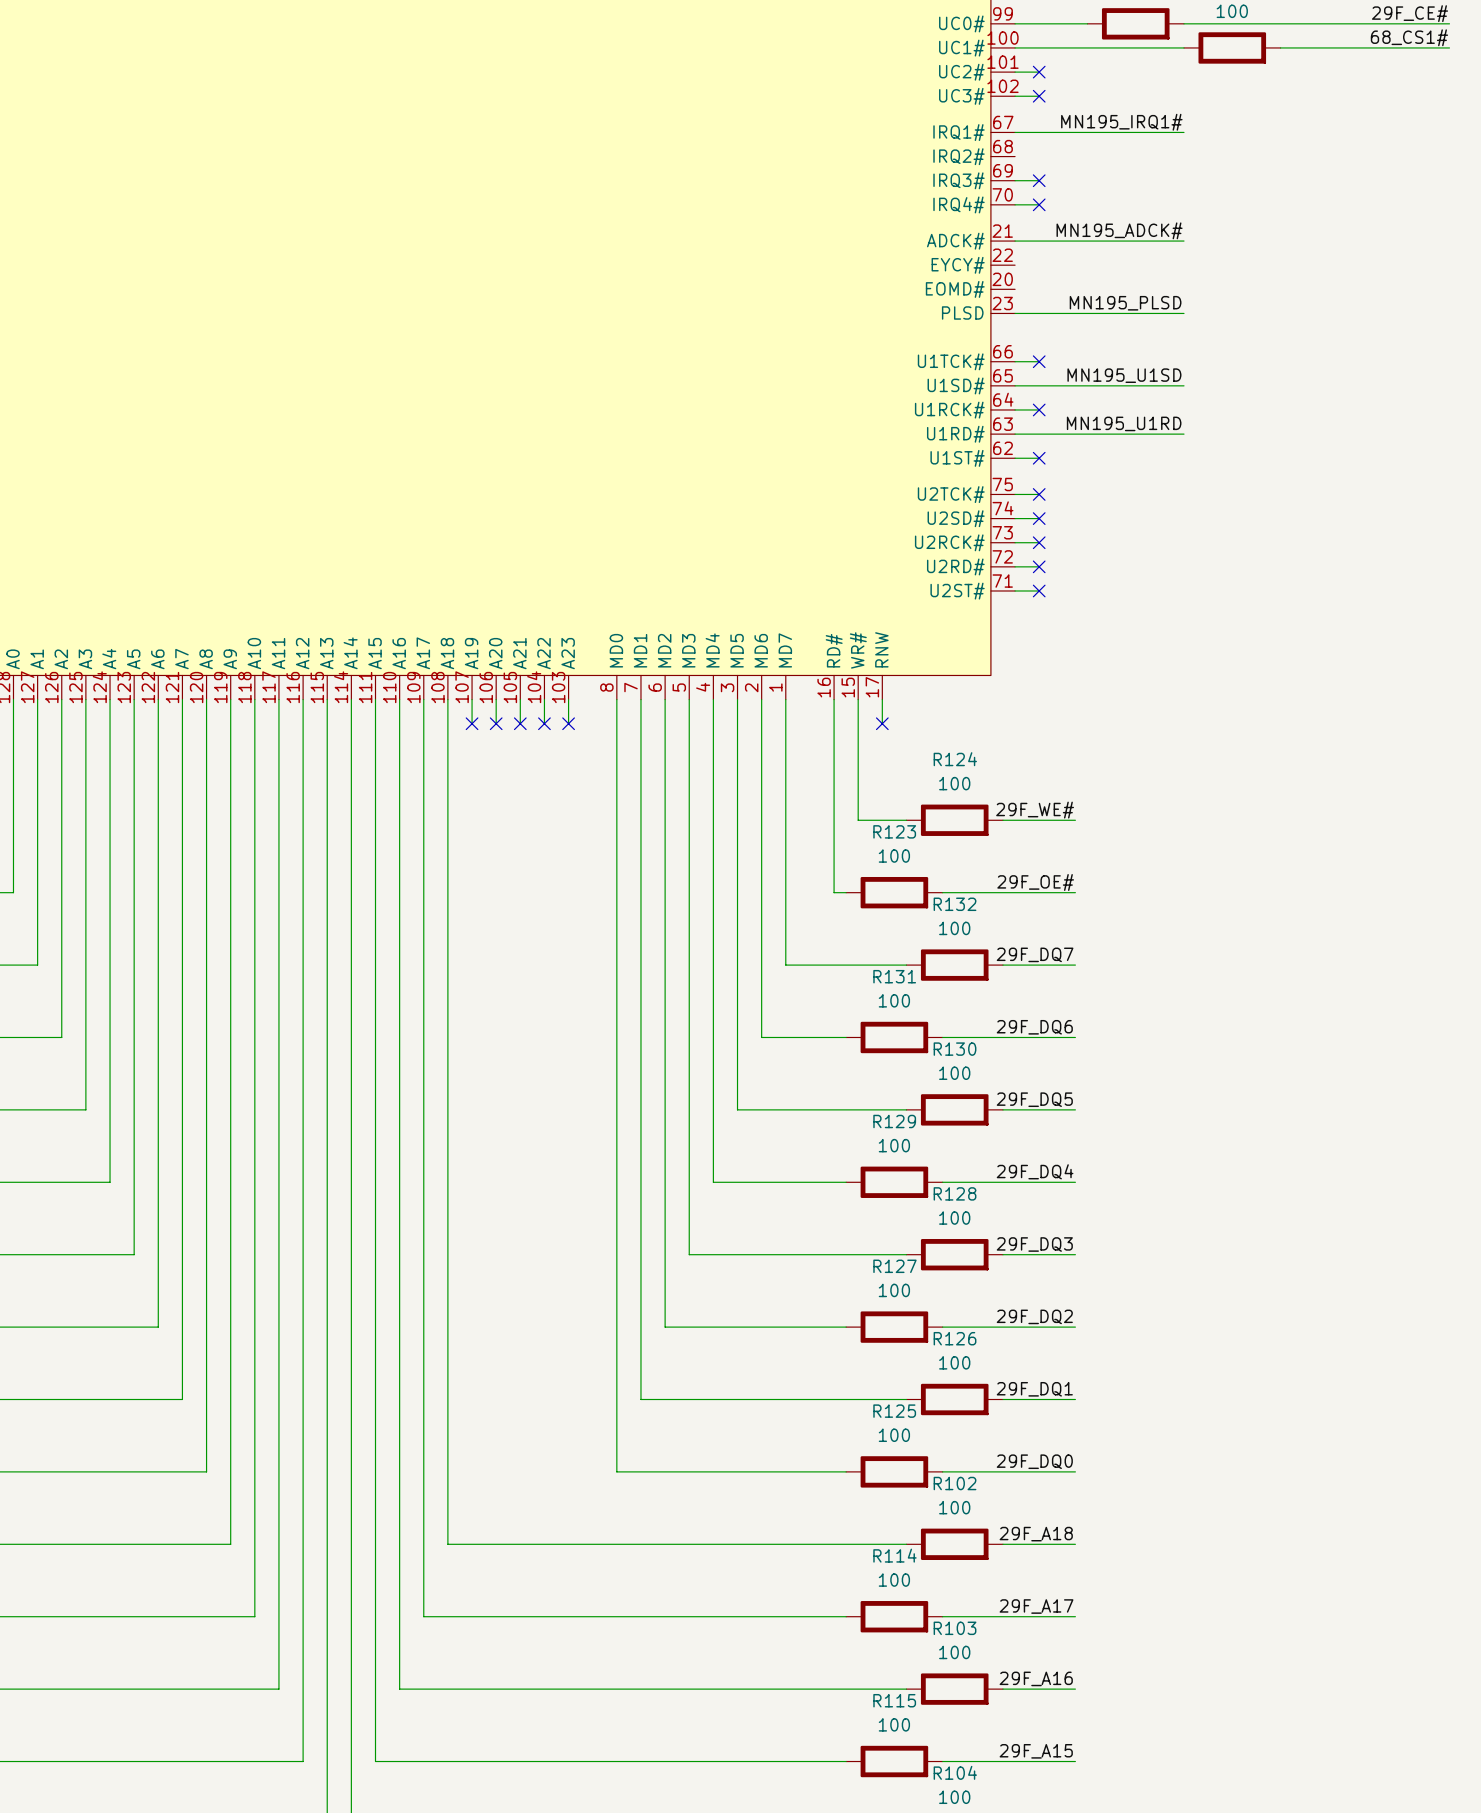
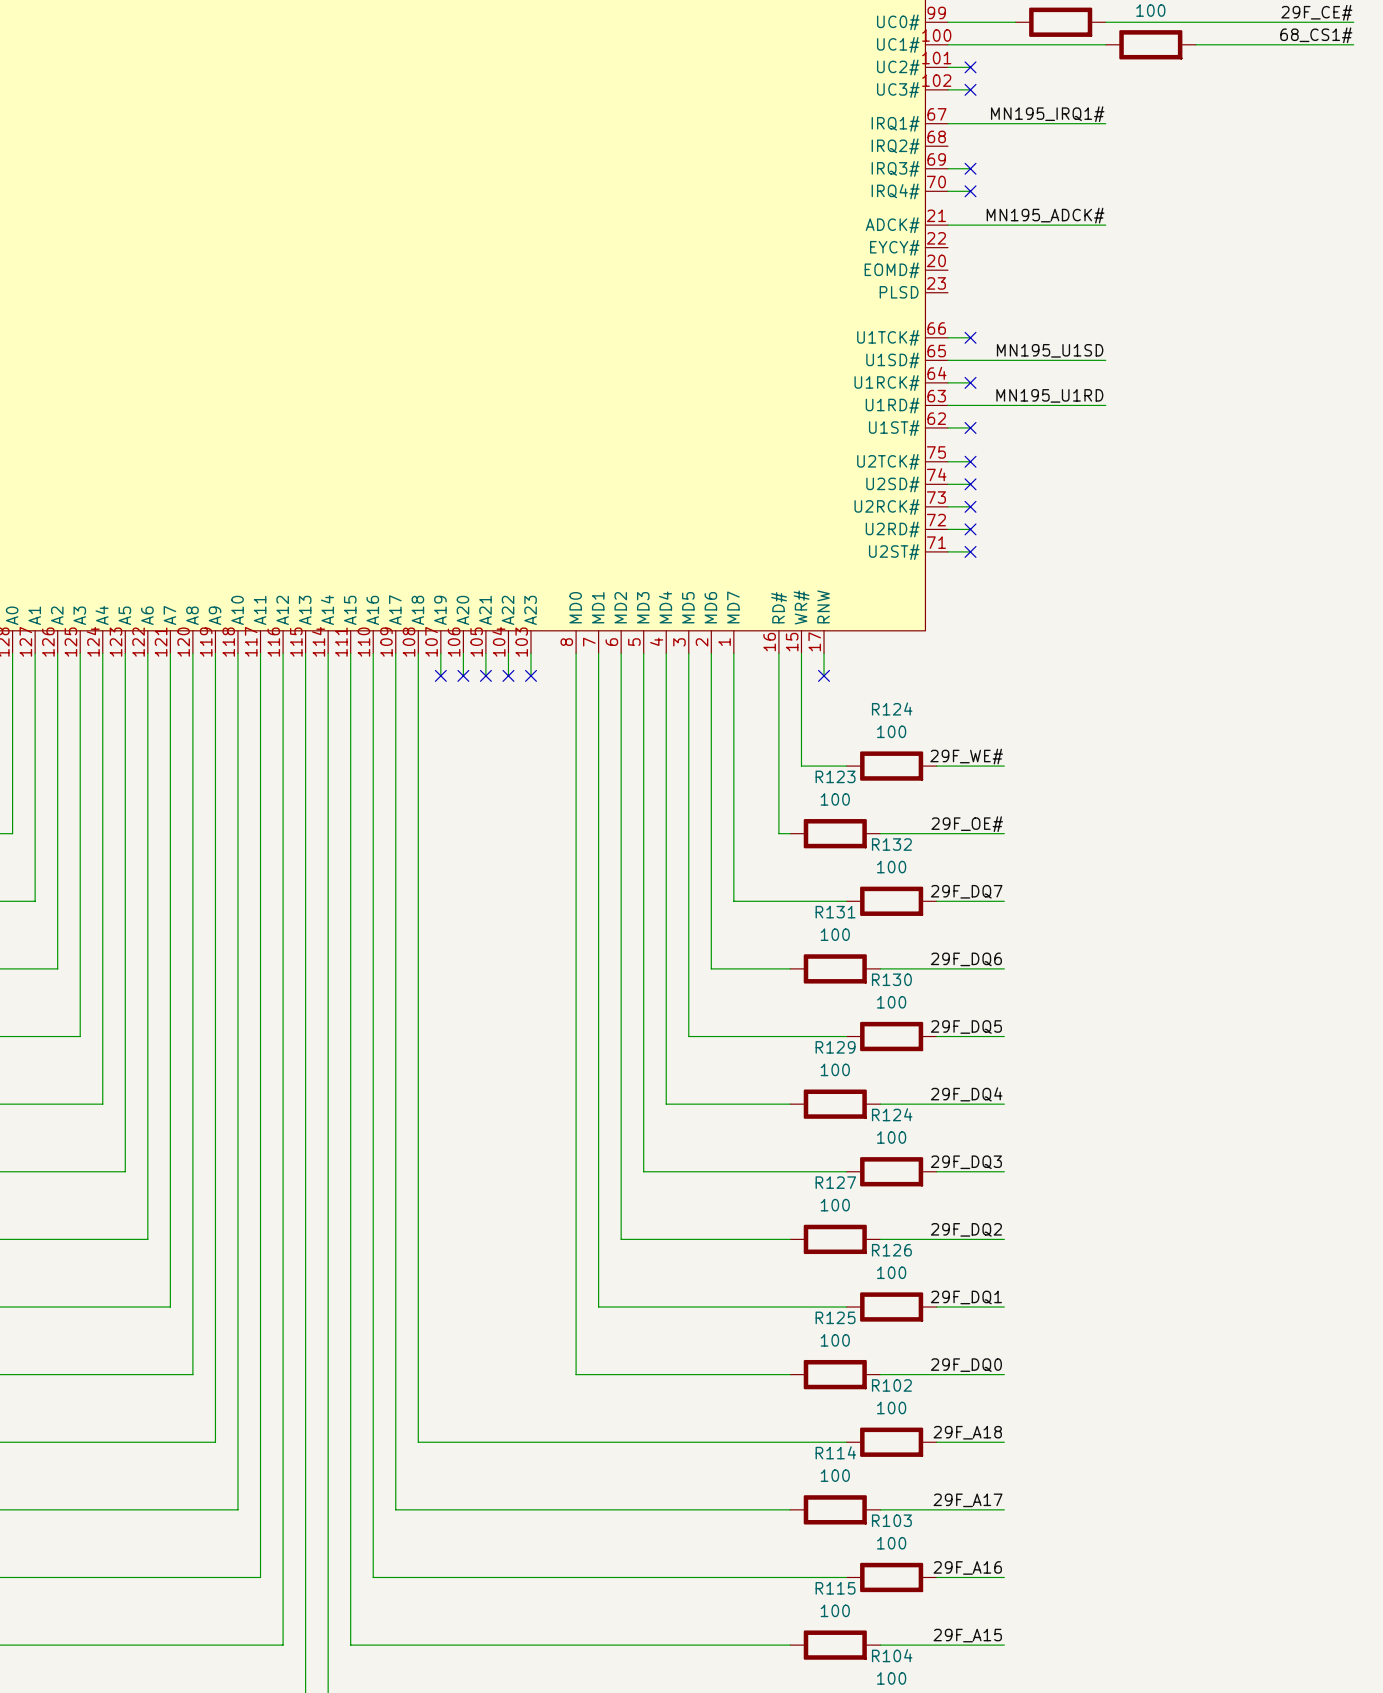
label: MN195_PLSD (1125, 303) -> none
wire: (1015, 313) (1184, 313) -> none
R128 name: R128 (955, 1193) -> R124 (892, 1114)

